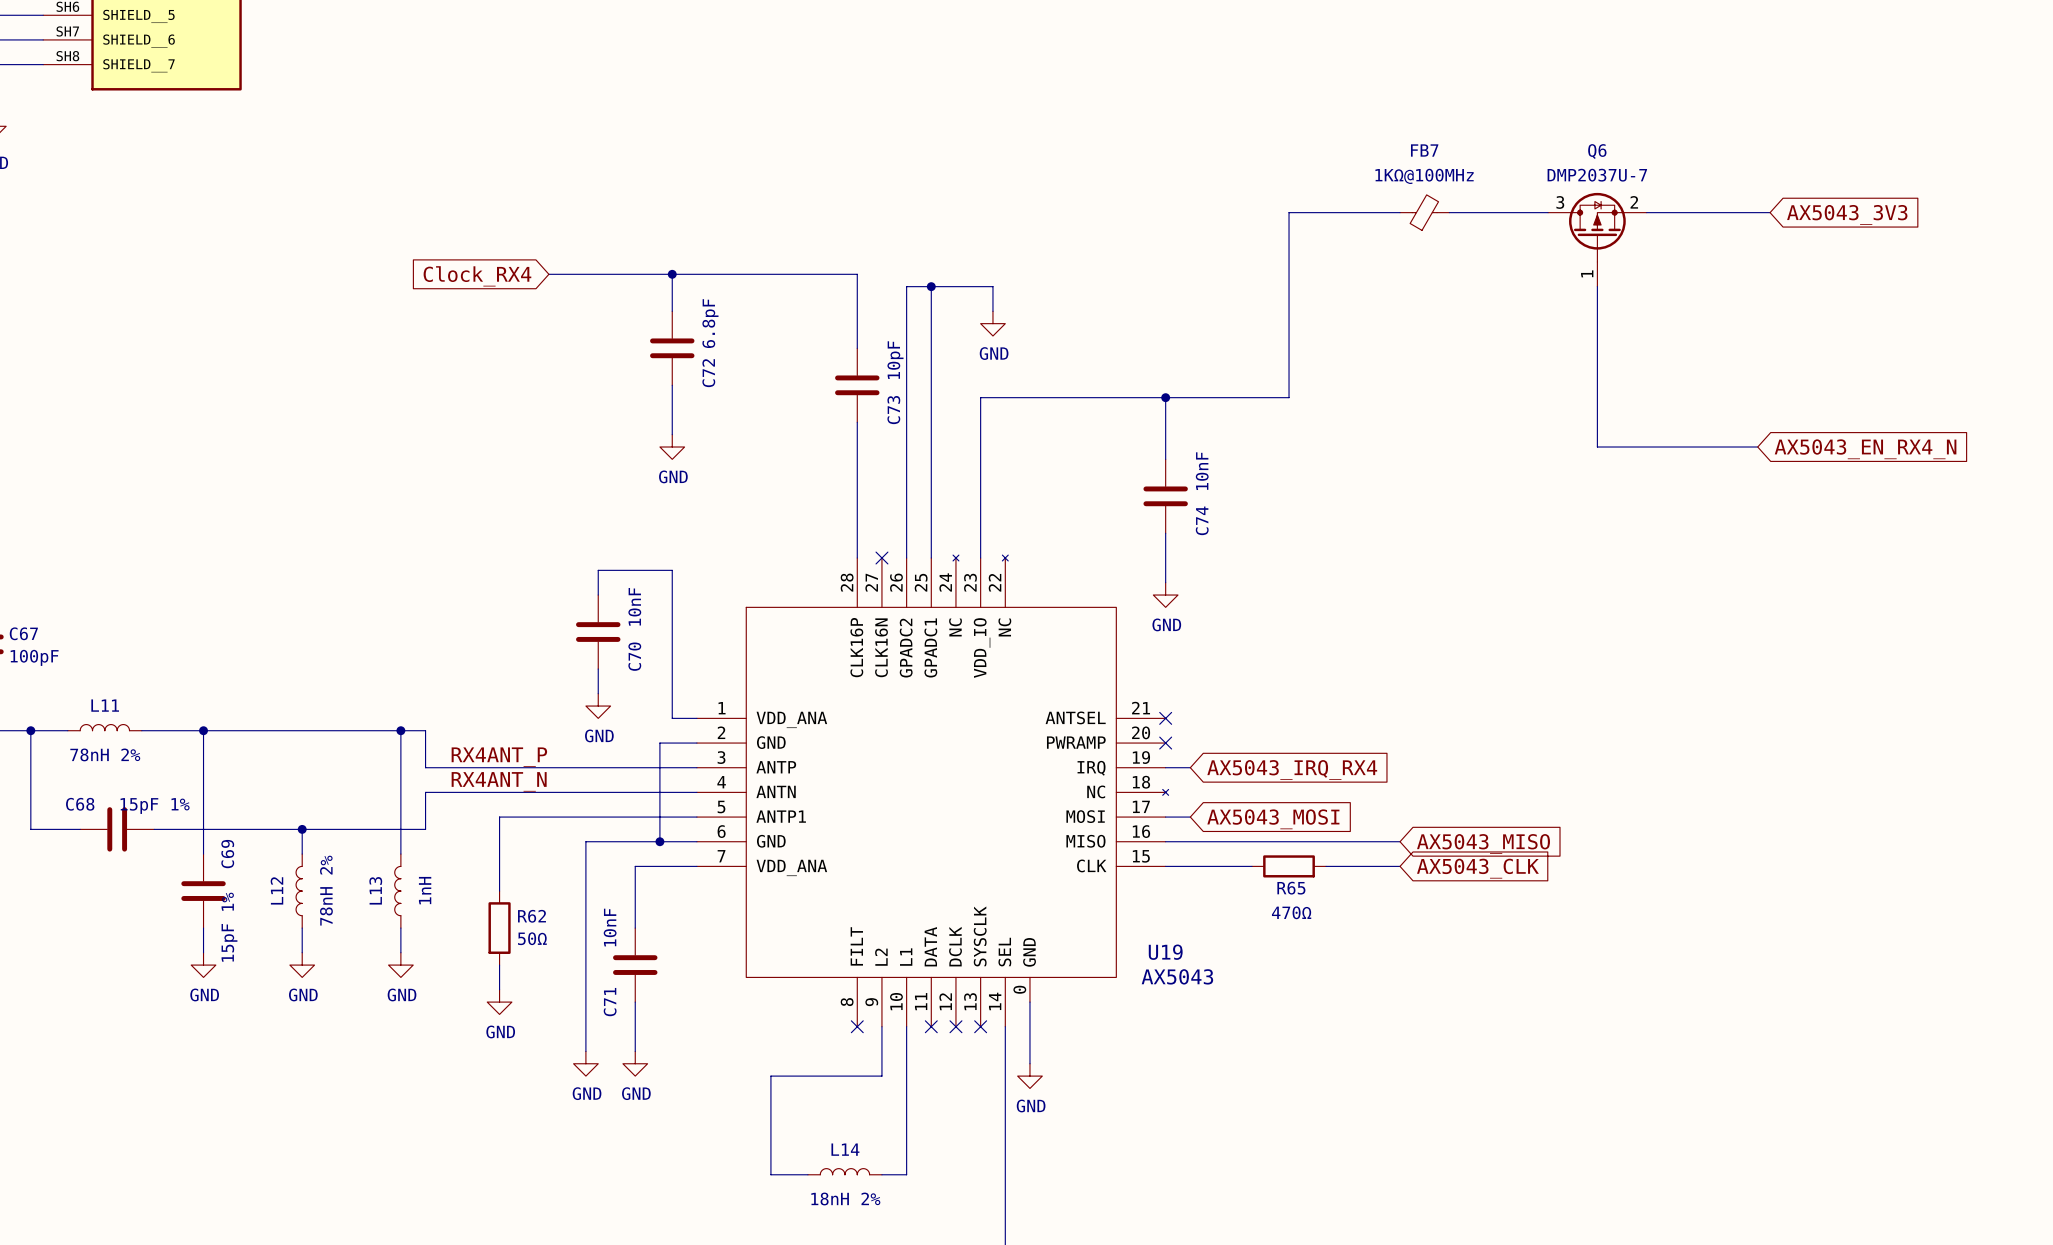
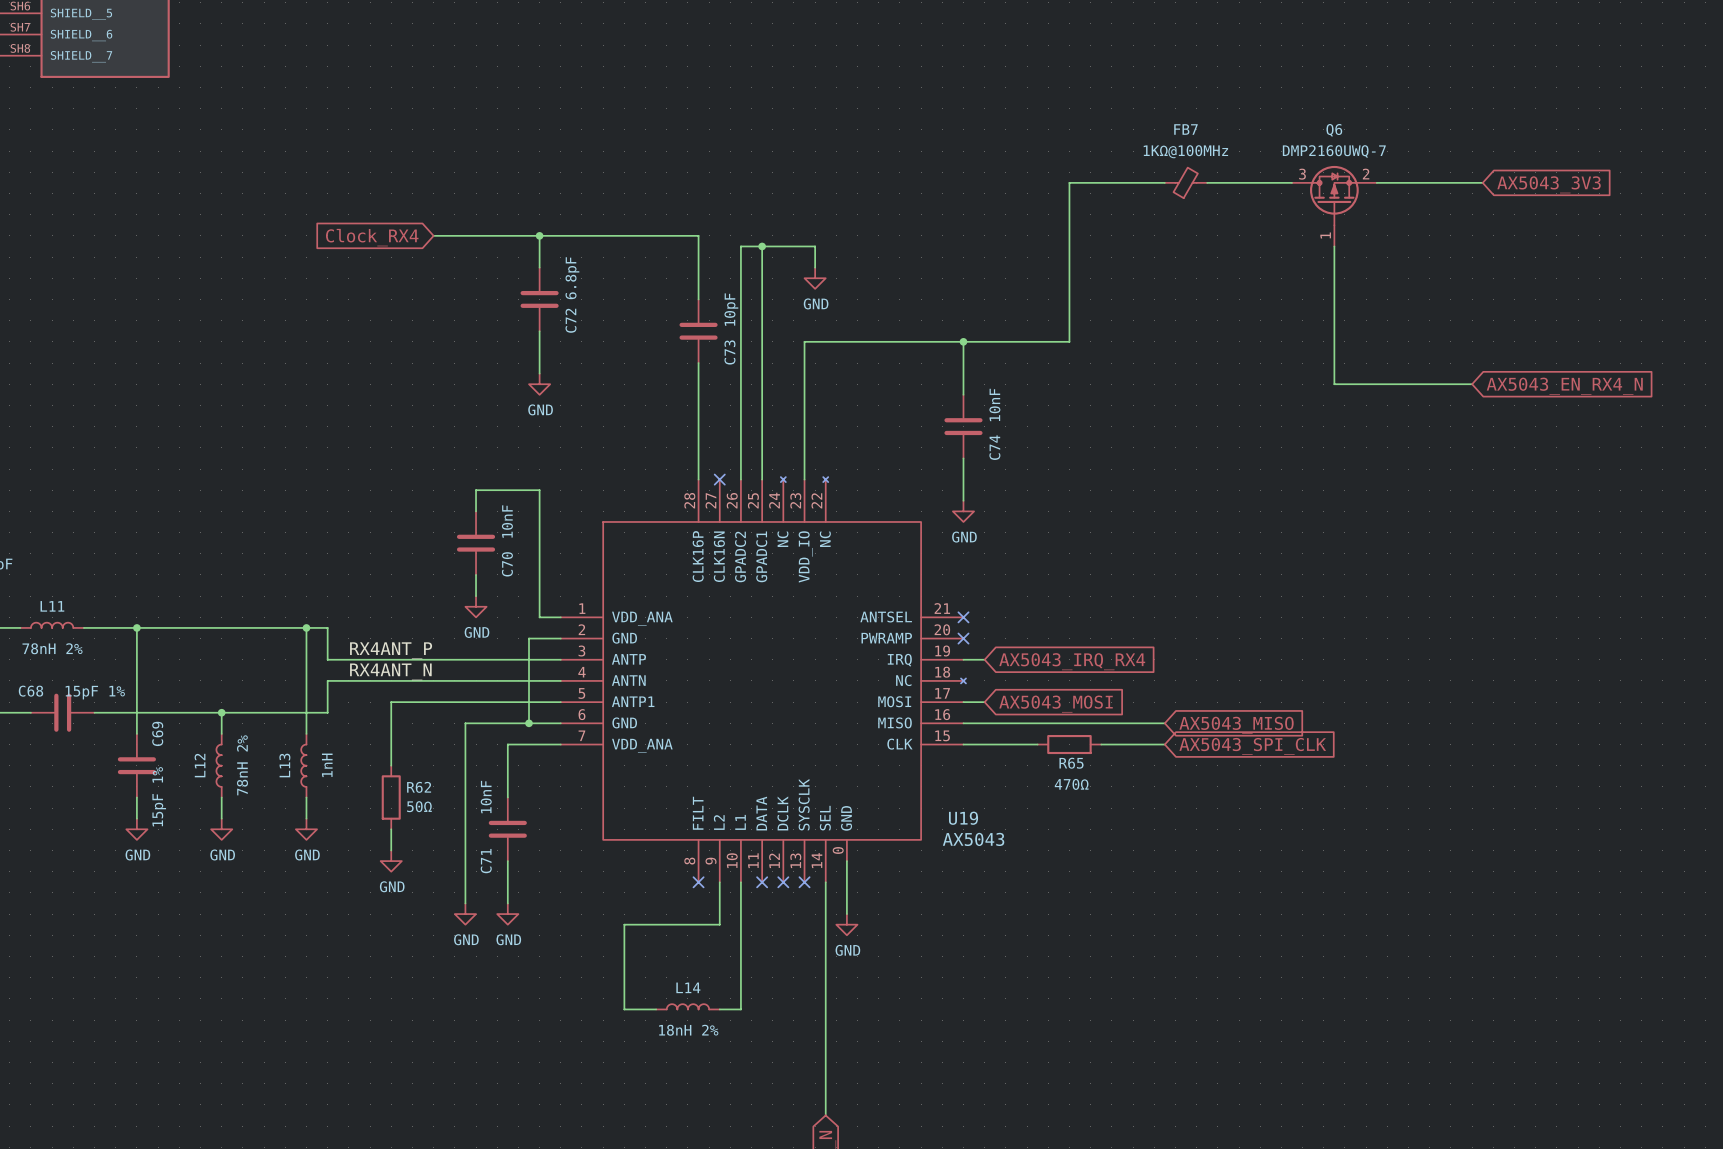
Q6 value: DMP2037U-7 (1597, 175) -> DMP2160UWQ-7 (1334, 151)
global label: AX5043_CLK (1477, 868) -> AX5043_SPI_CLK (1252, 746)

